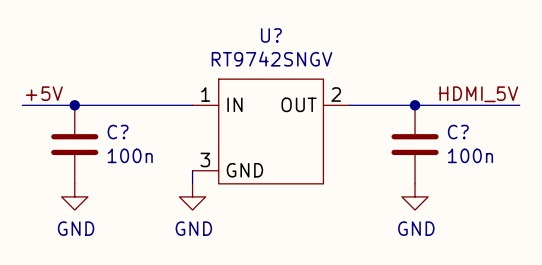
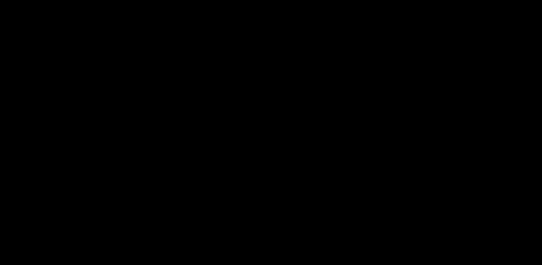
label: +5V (44, 93) -> none
label: HDMI_5V (478, 94) -> none
wire: (22, 105) (192, 105) -> none
junction: (74, 105) -> none
wire: (349, 105) (519, 105) -> none
junction: (415, 105) -> none
U?: RT9742SNGV (271, 131) -> none
C?: 100n (74, 144) -> none
C?: 100n (415, 144) -> none
wire: (192, 170) (192, 183) -> none
power symbol: GND (74, 196) -> none
power symbol: GND (192, 196) -> none
power symbol: GND (415, 196) -> none

